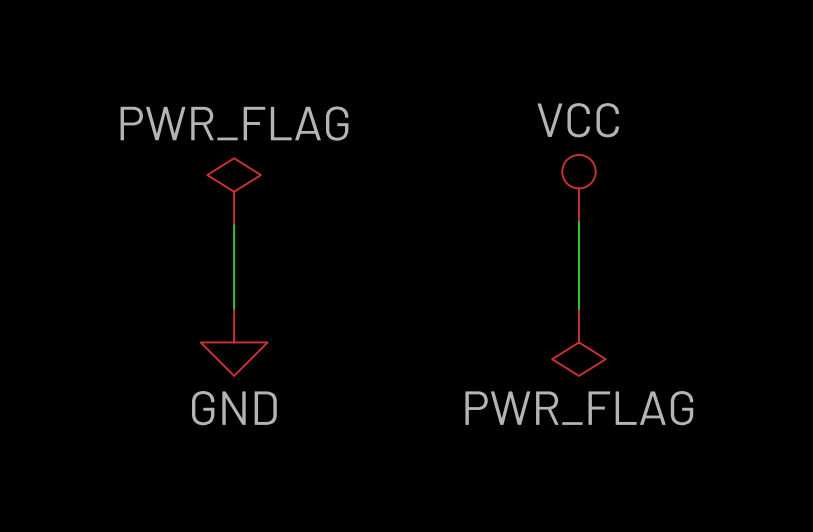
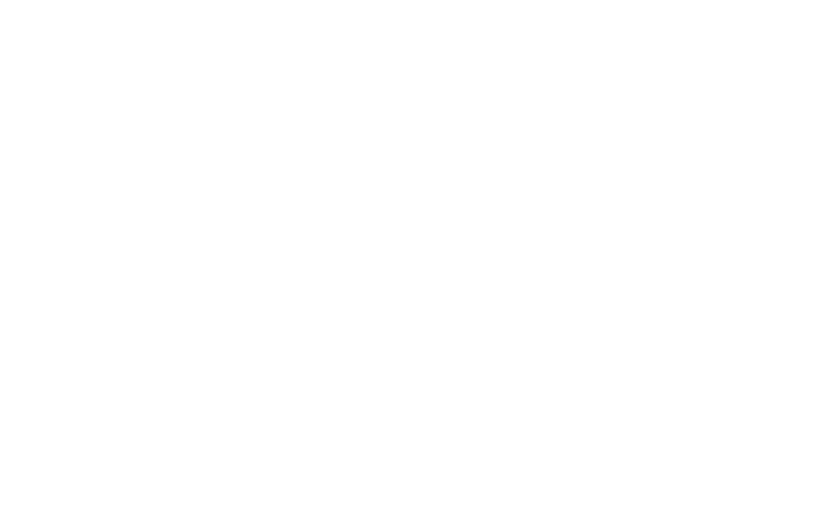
power symbol: VCC (578, 188) -> none
power symbol: PWR_FLAG (234, 191) -> none
wire: (578, 221) (578, 308) -> none
wire: (234, 225) (234, 308) -> none
power symbol: GND (234, 342) -> none
power symbol: PWR_FLAG (578, 342) -> none

